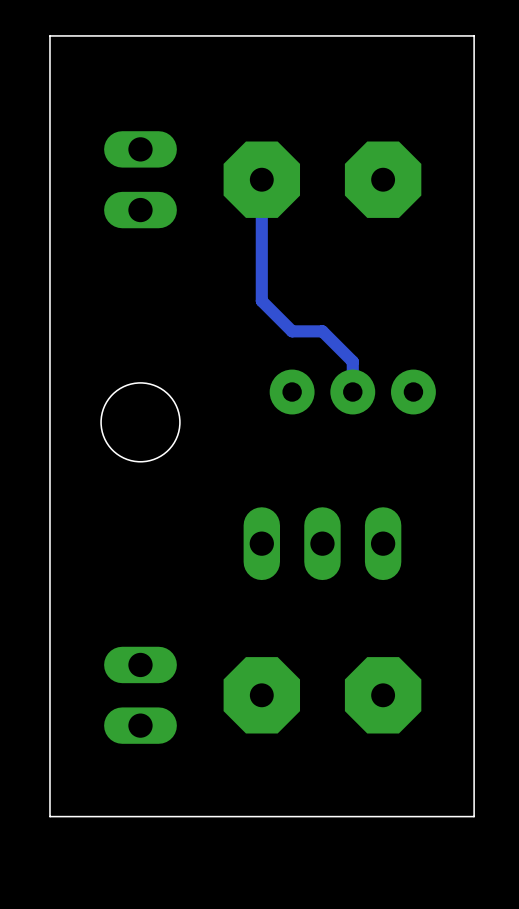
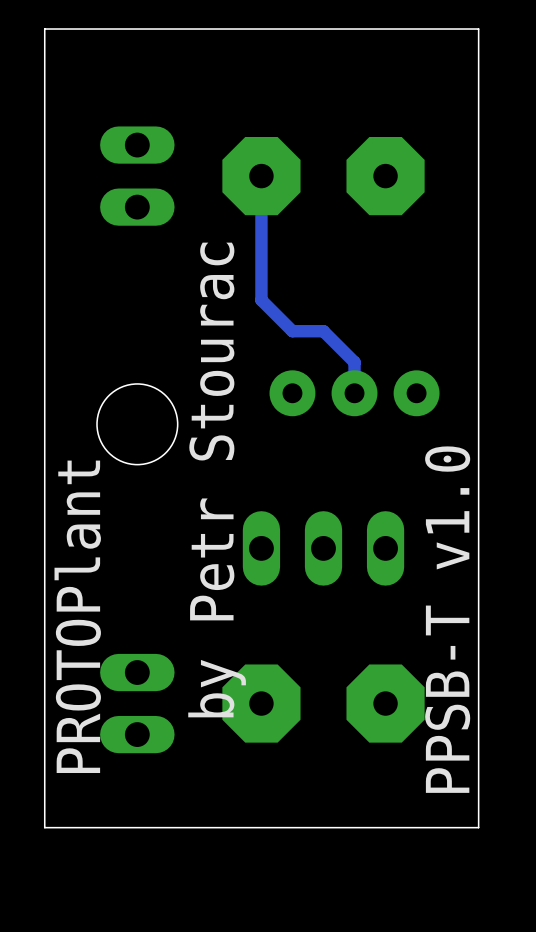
text: none -> by Petr Stourac (217, 479)
text: none -> PROTOPlant (77, 616)
text: none -> PPSB-T v1.0 (447, 619)

